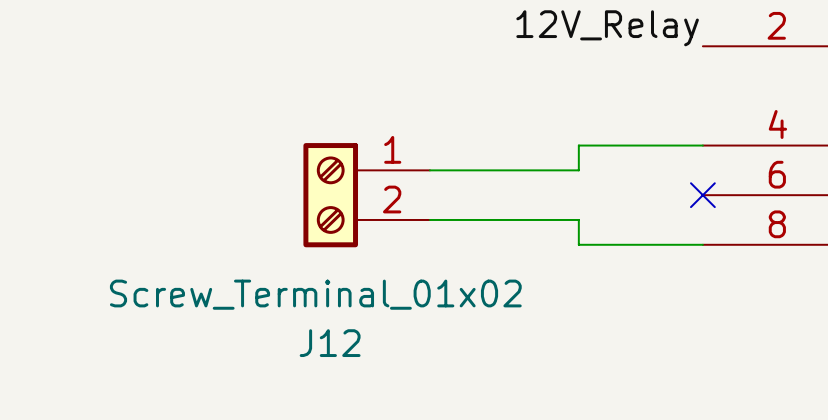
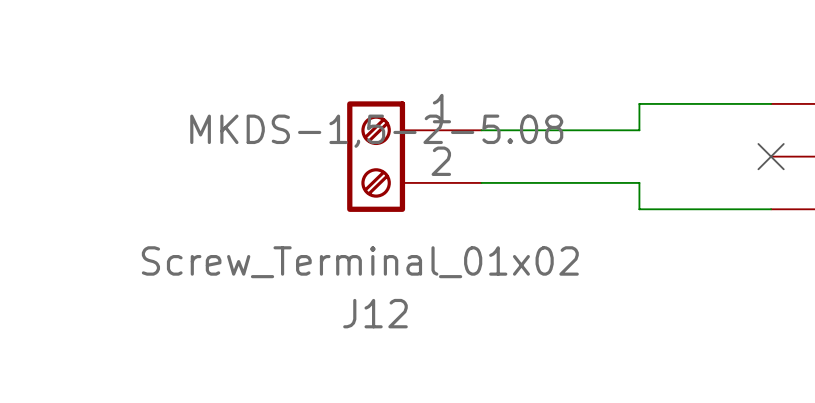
J12 text: none -> MKDS-1,5-2-5.08 (376, 131)

